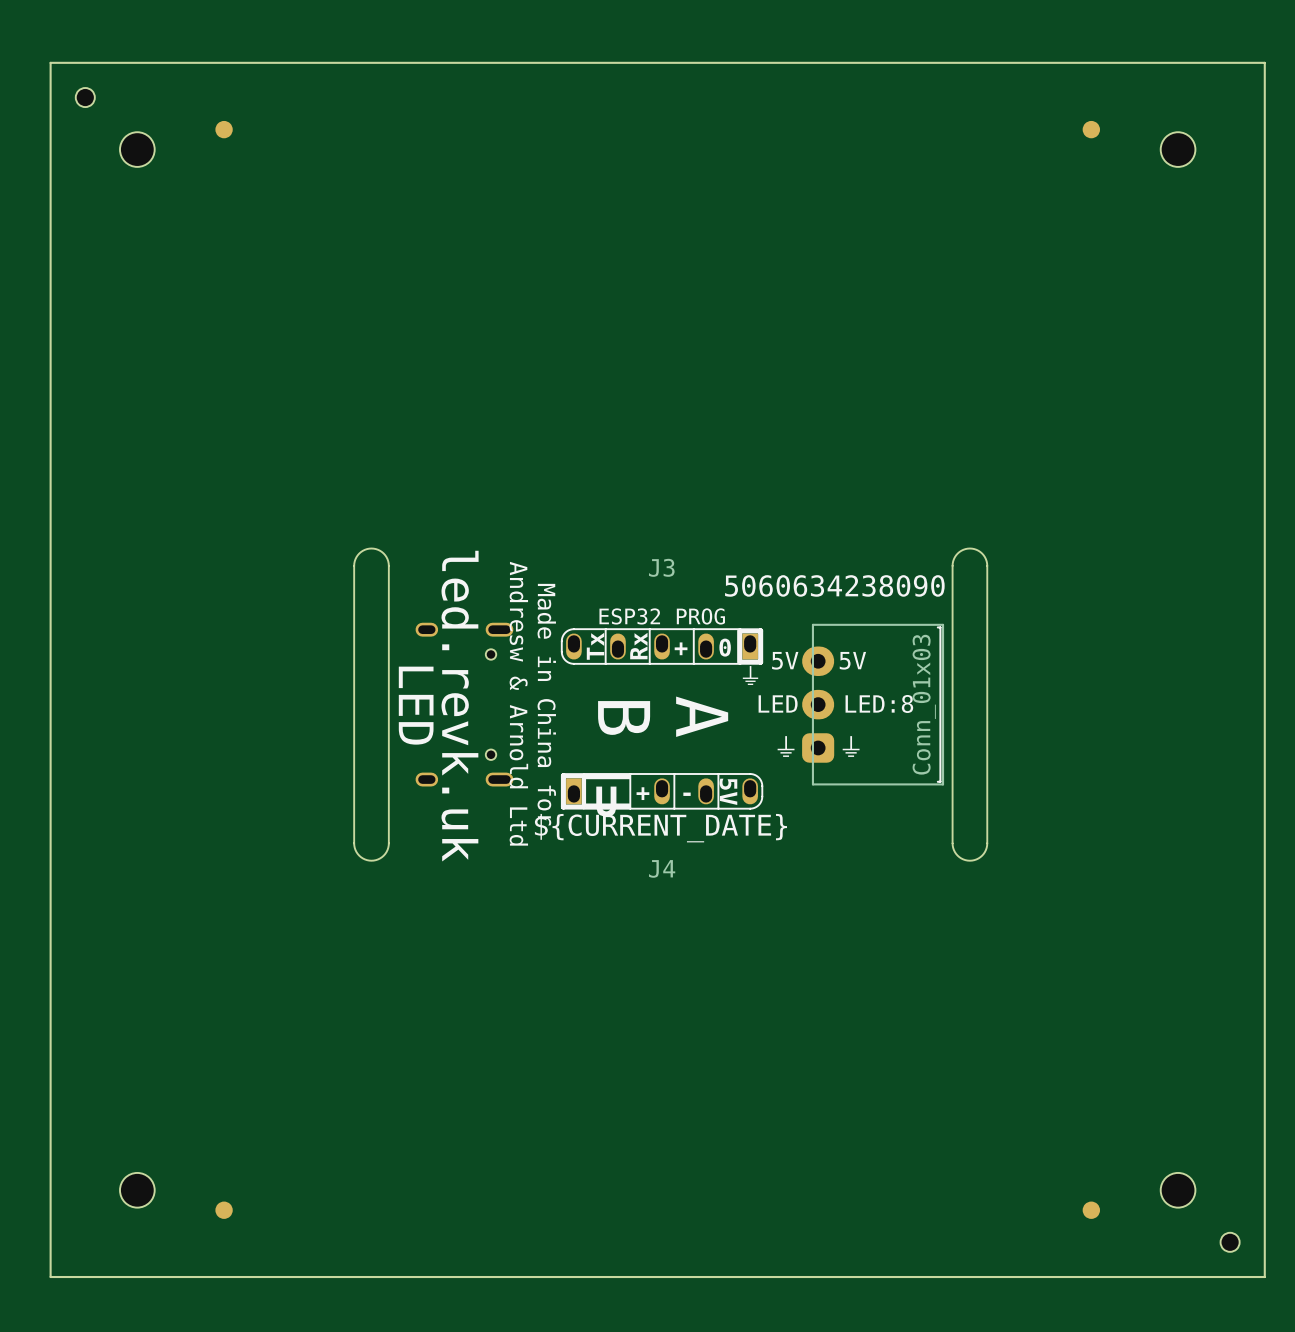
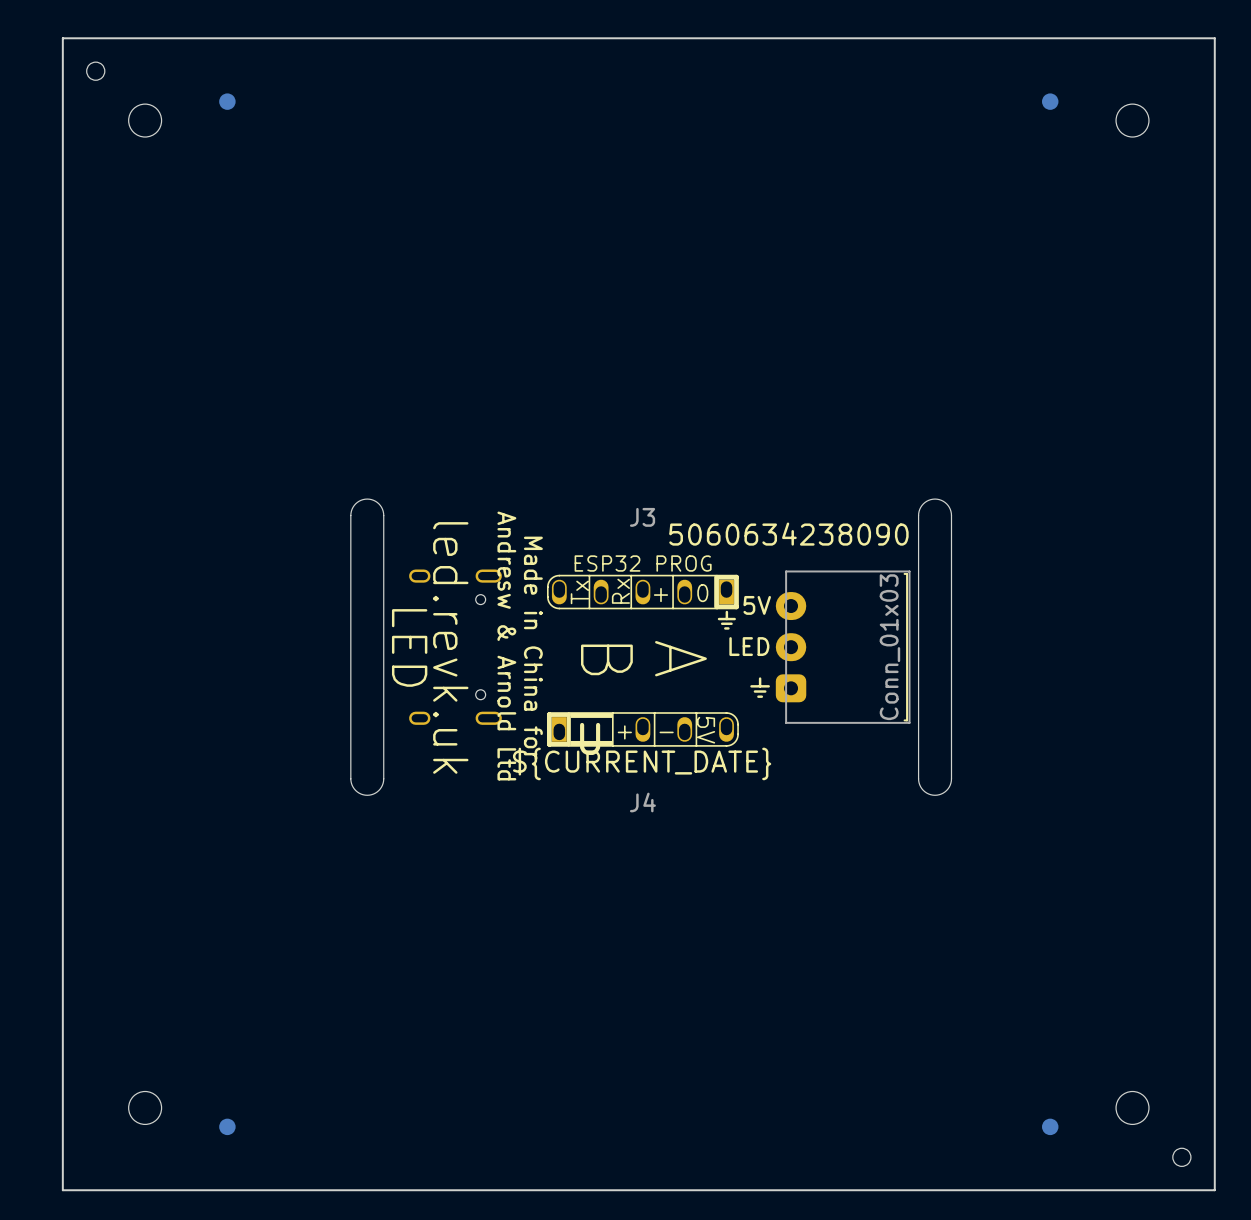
text: 5V (852, 660) -> none
text: LED:8 (879, 703) -> none
text: ⏚ (851, 746) -> none

